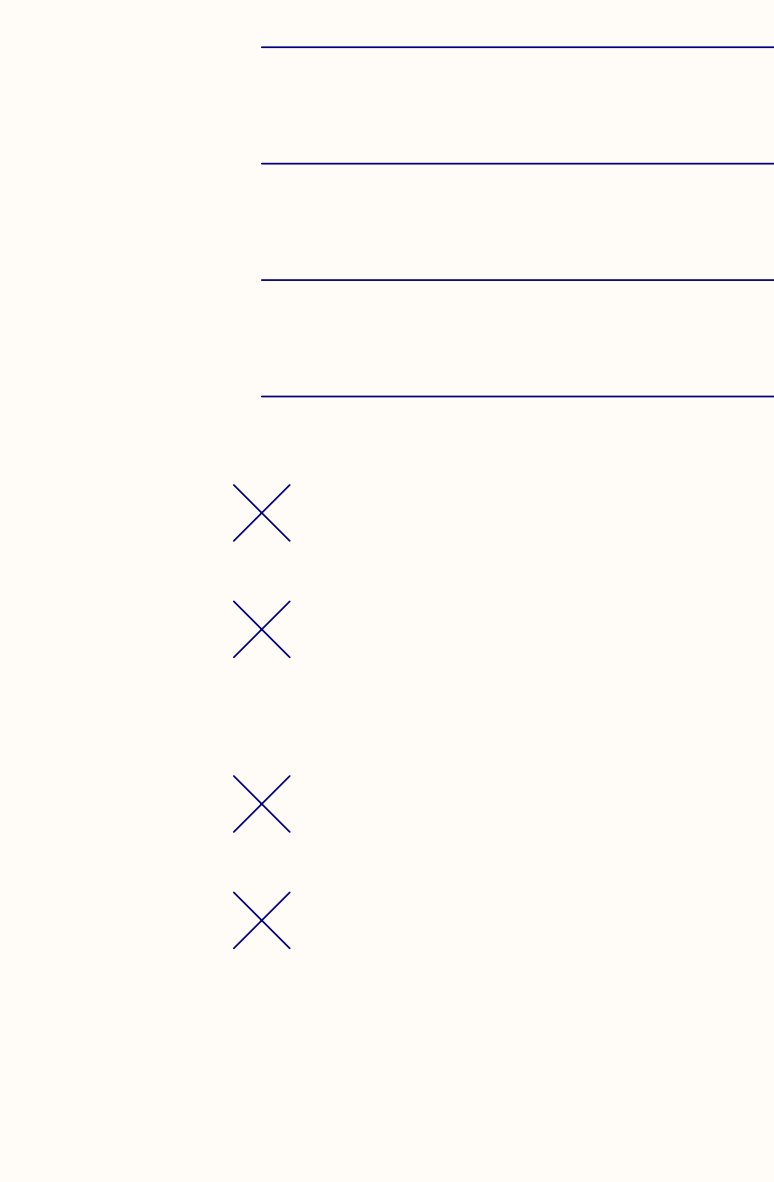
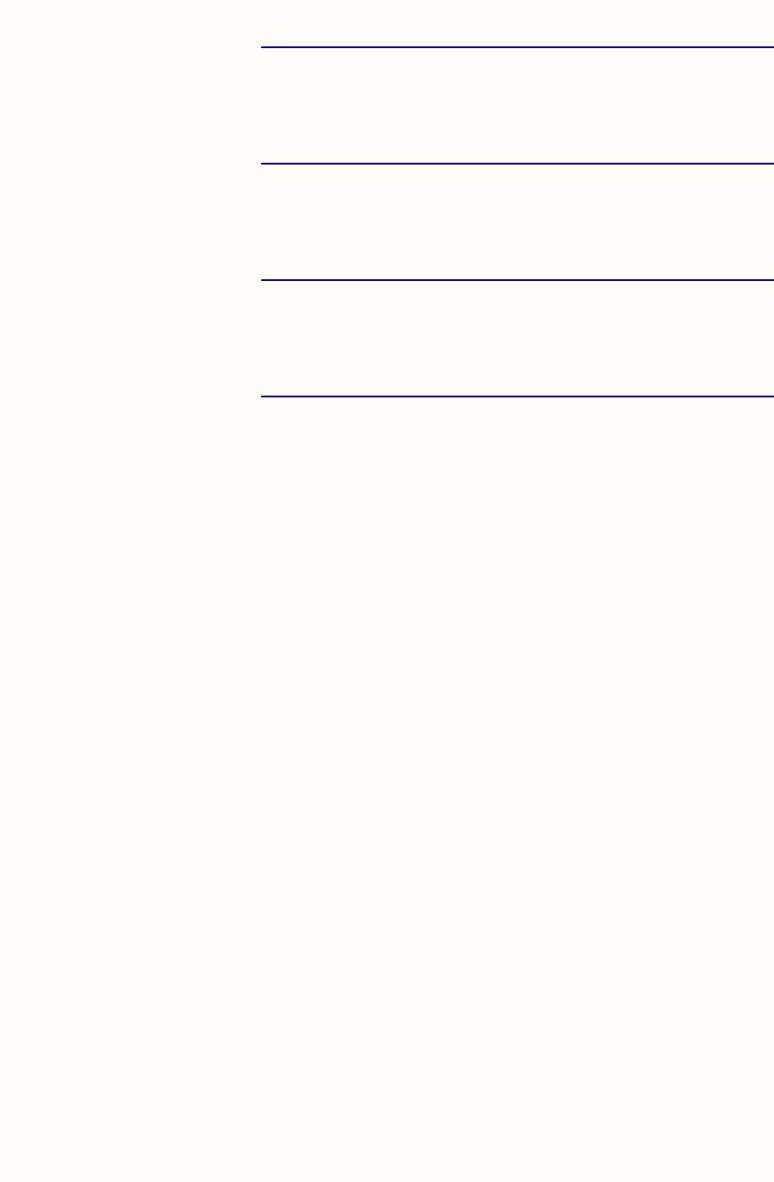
no-connect mark: (261, 512) -> none
no-connect mark: (261, 629) -> none
no-connect mark: (261, 803) -> none
no-connect mark: (261, 920) -> none

